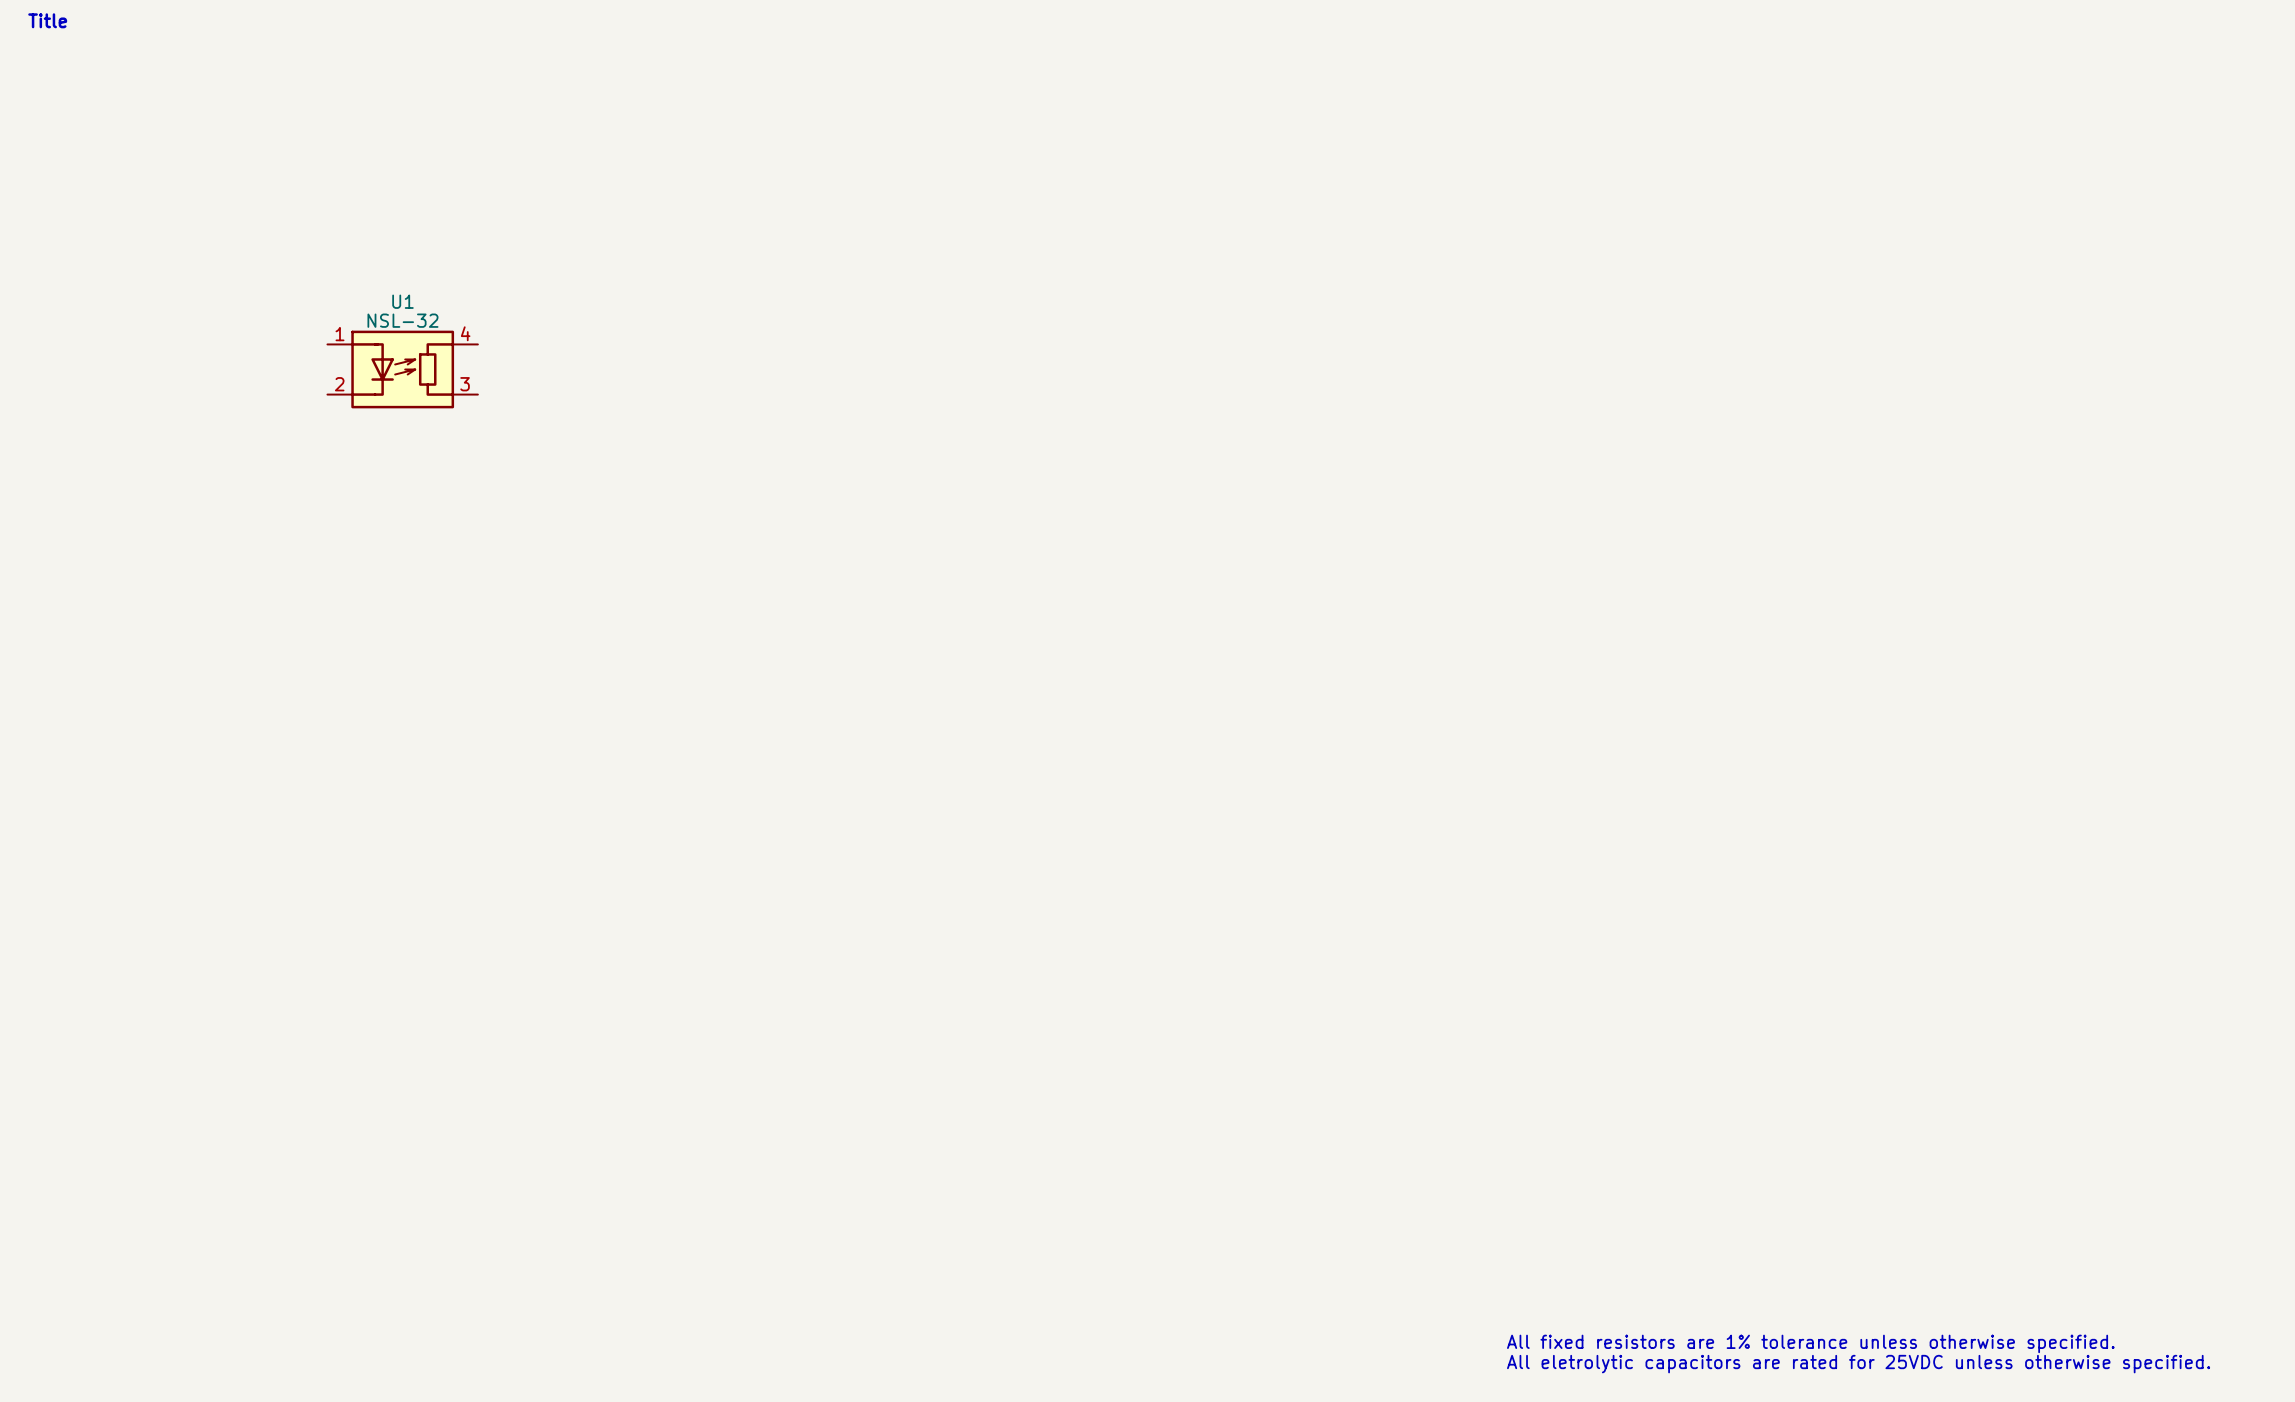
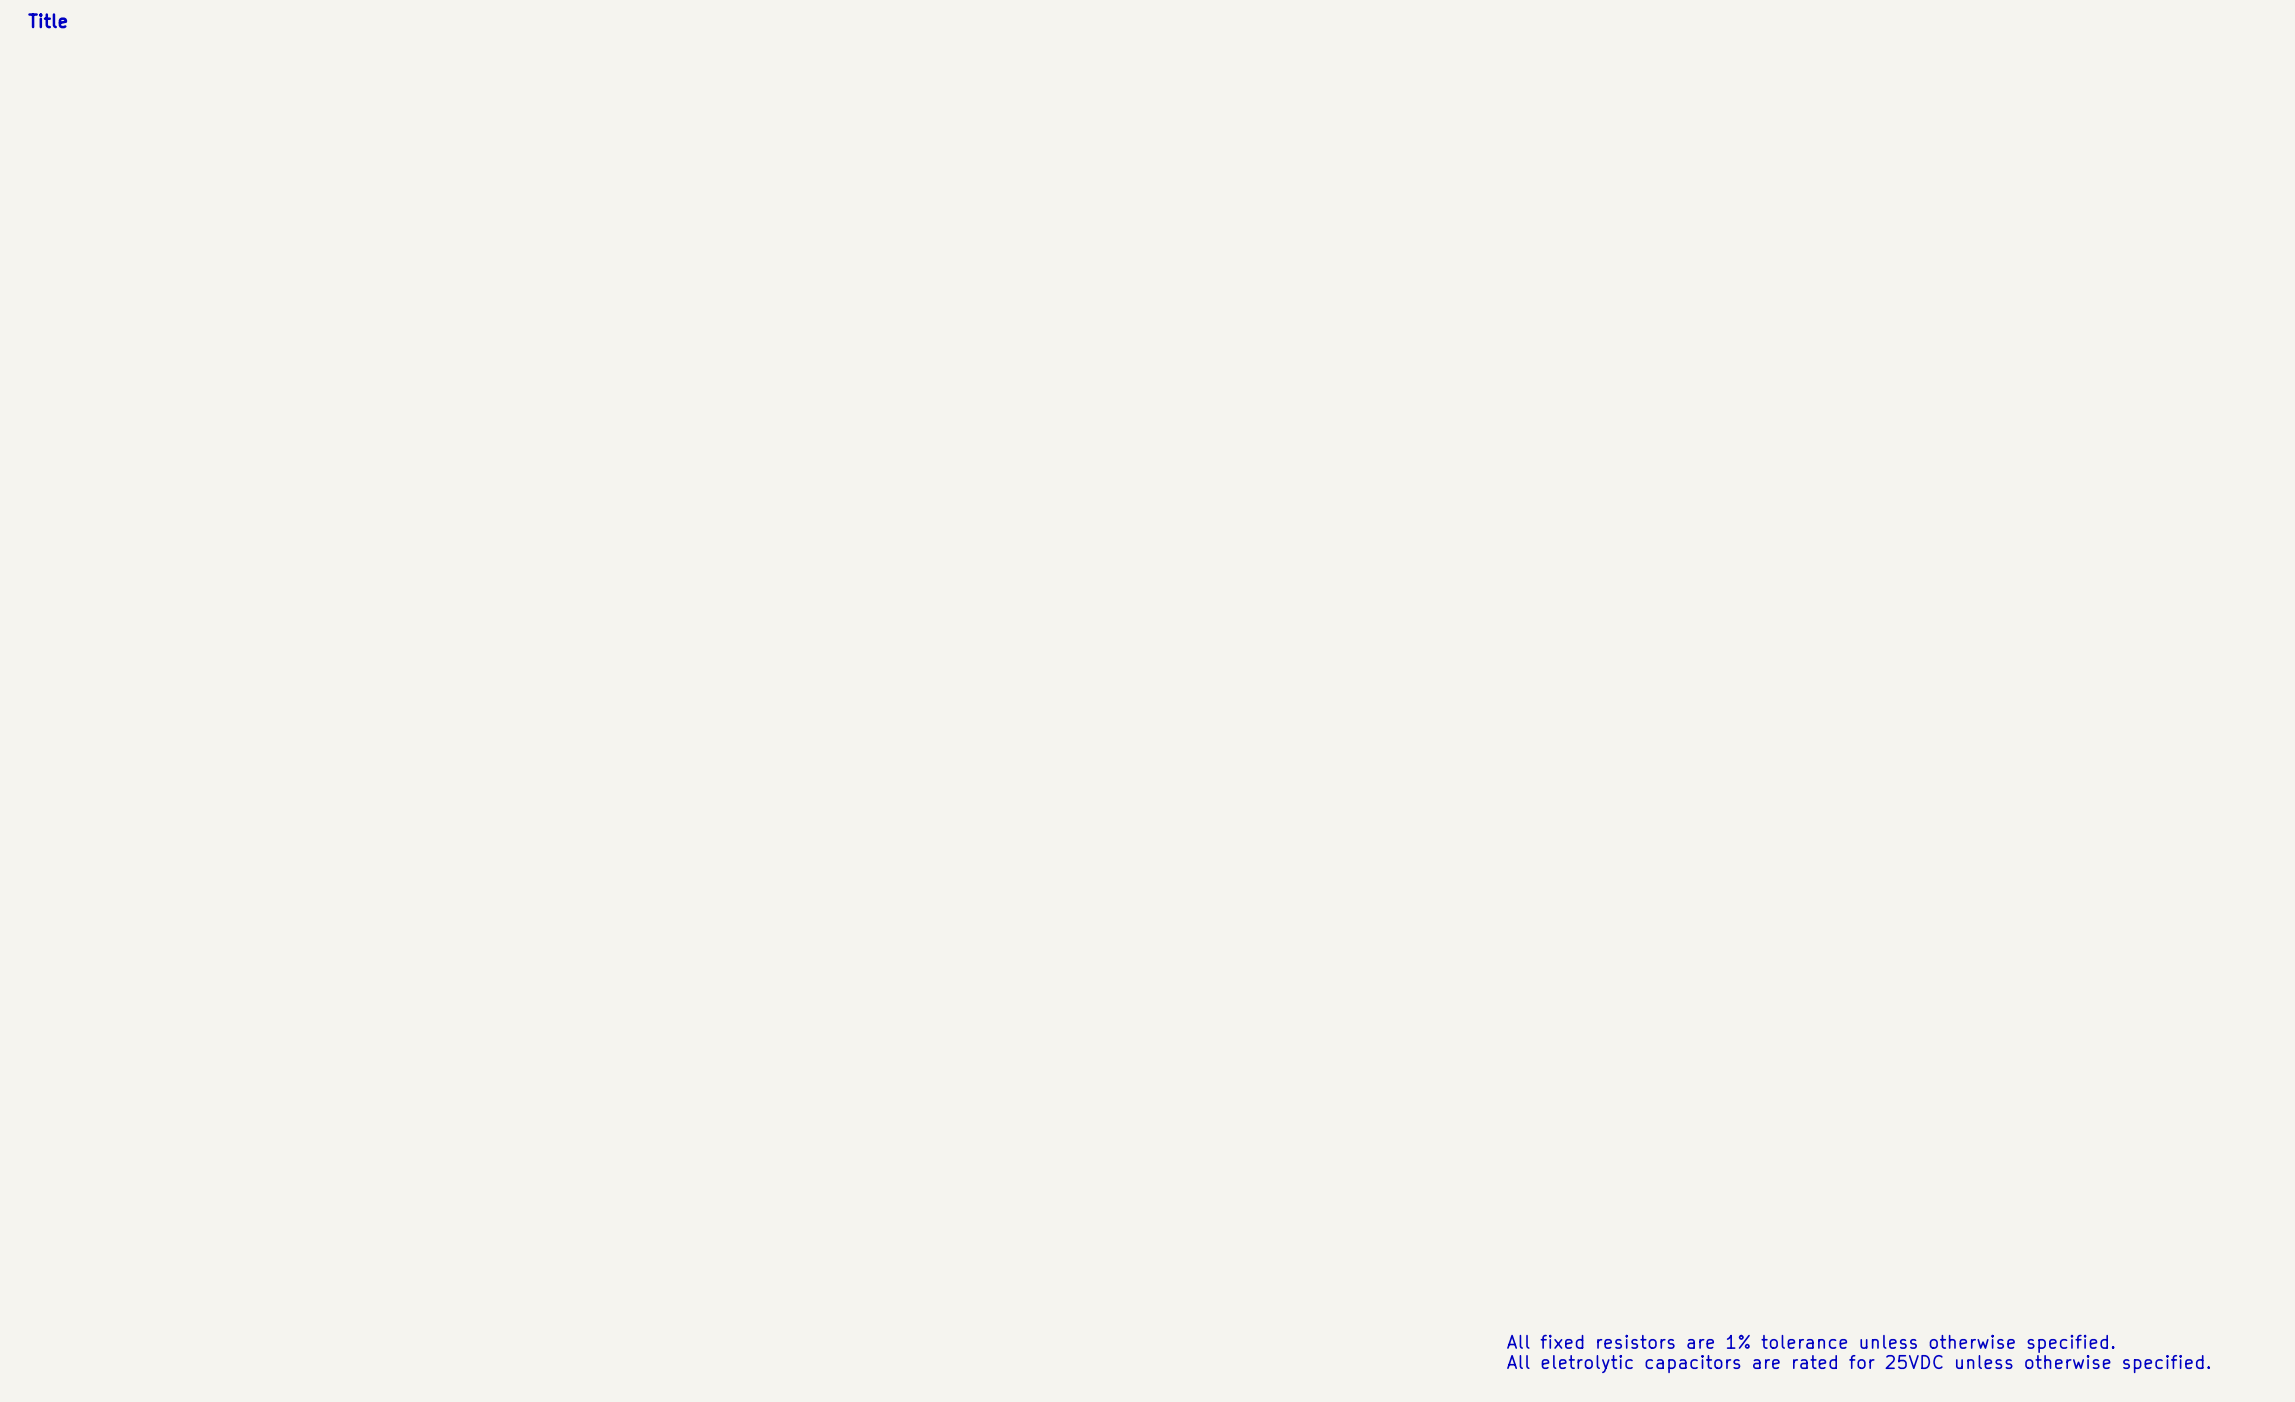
U1: NSL-32 (402, 369) -> none

